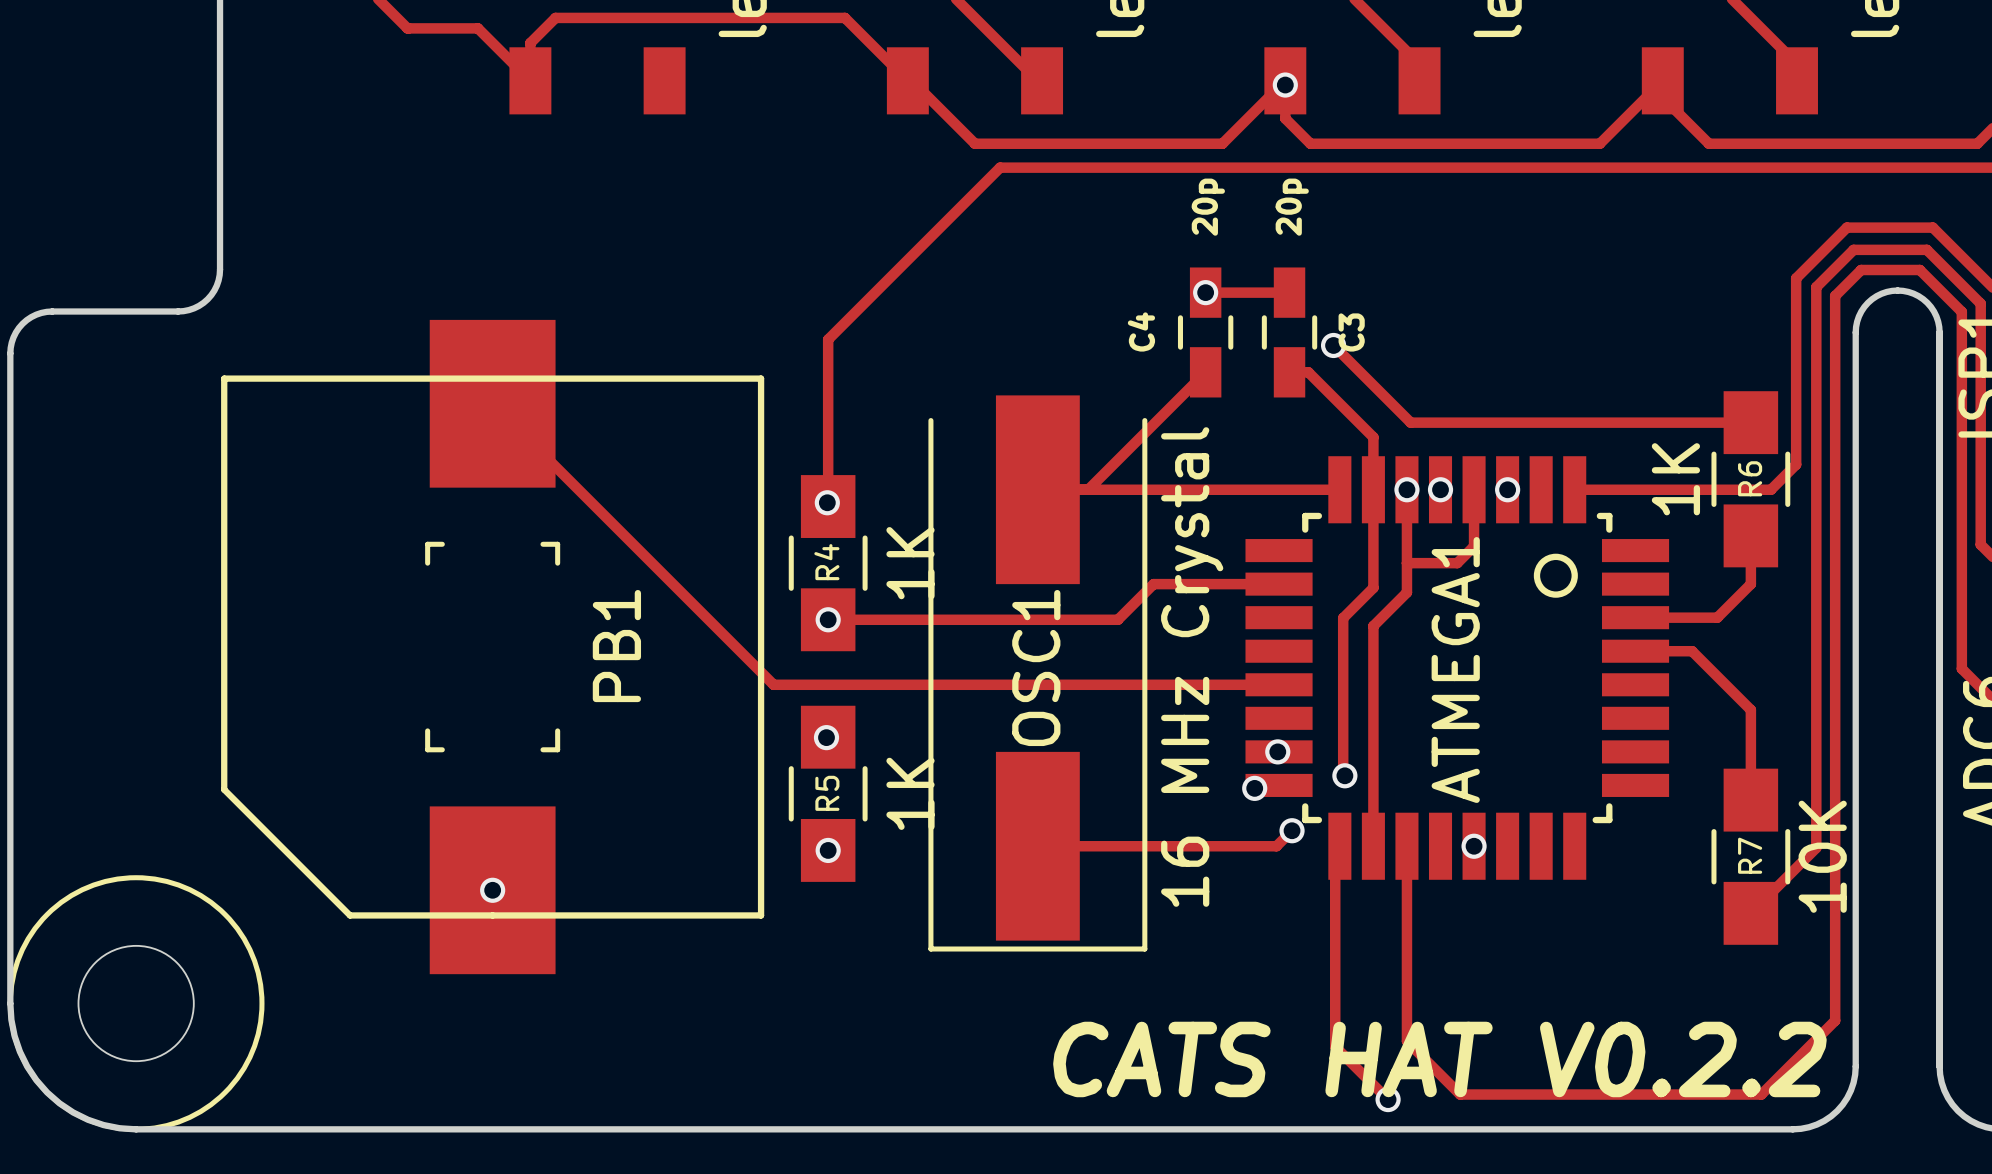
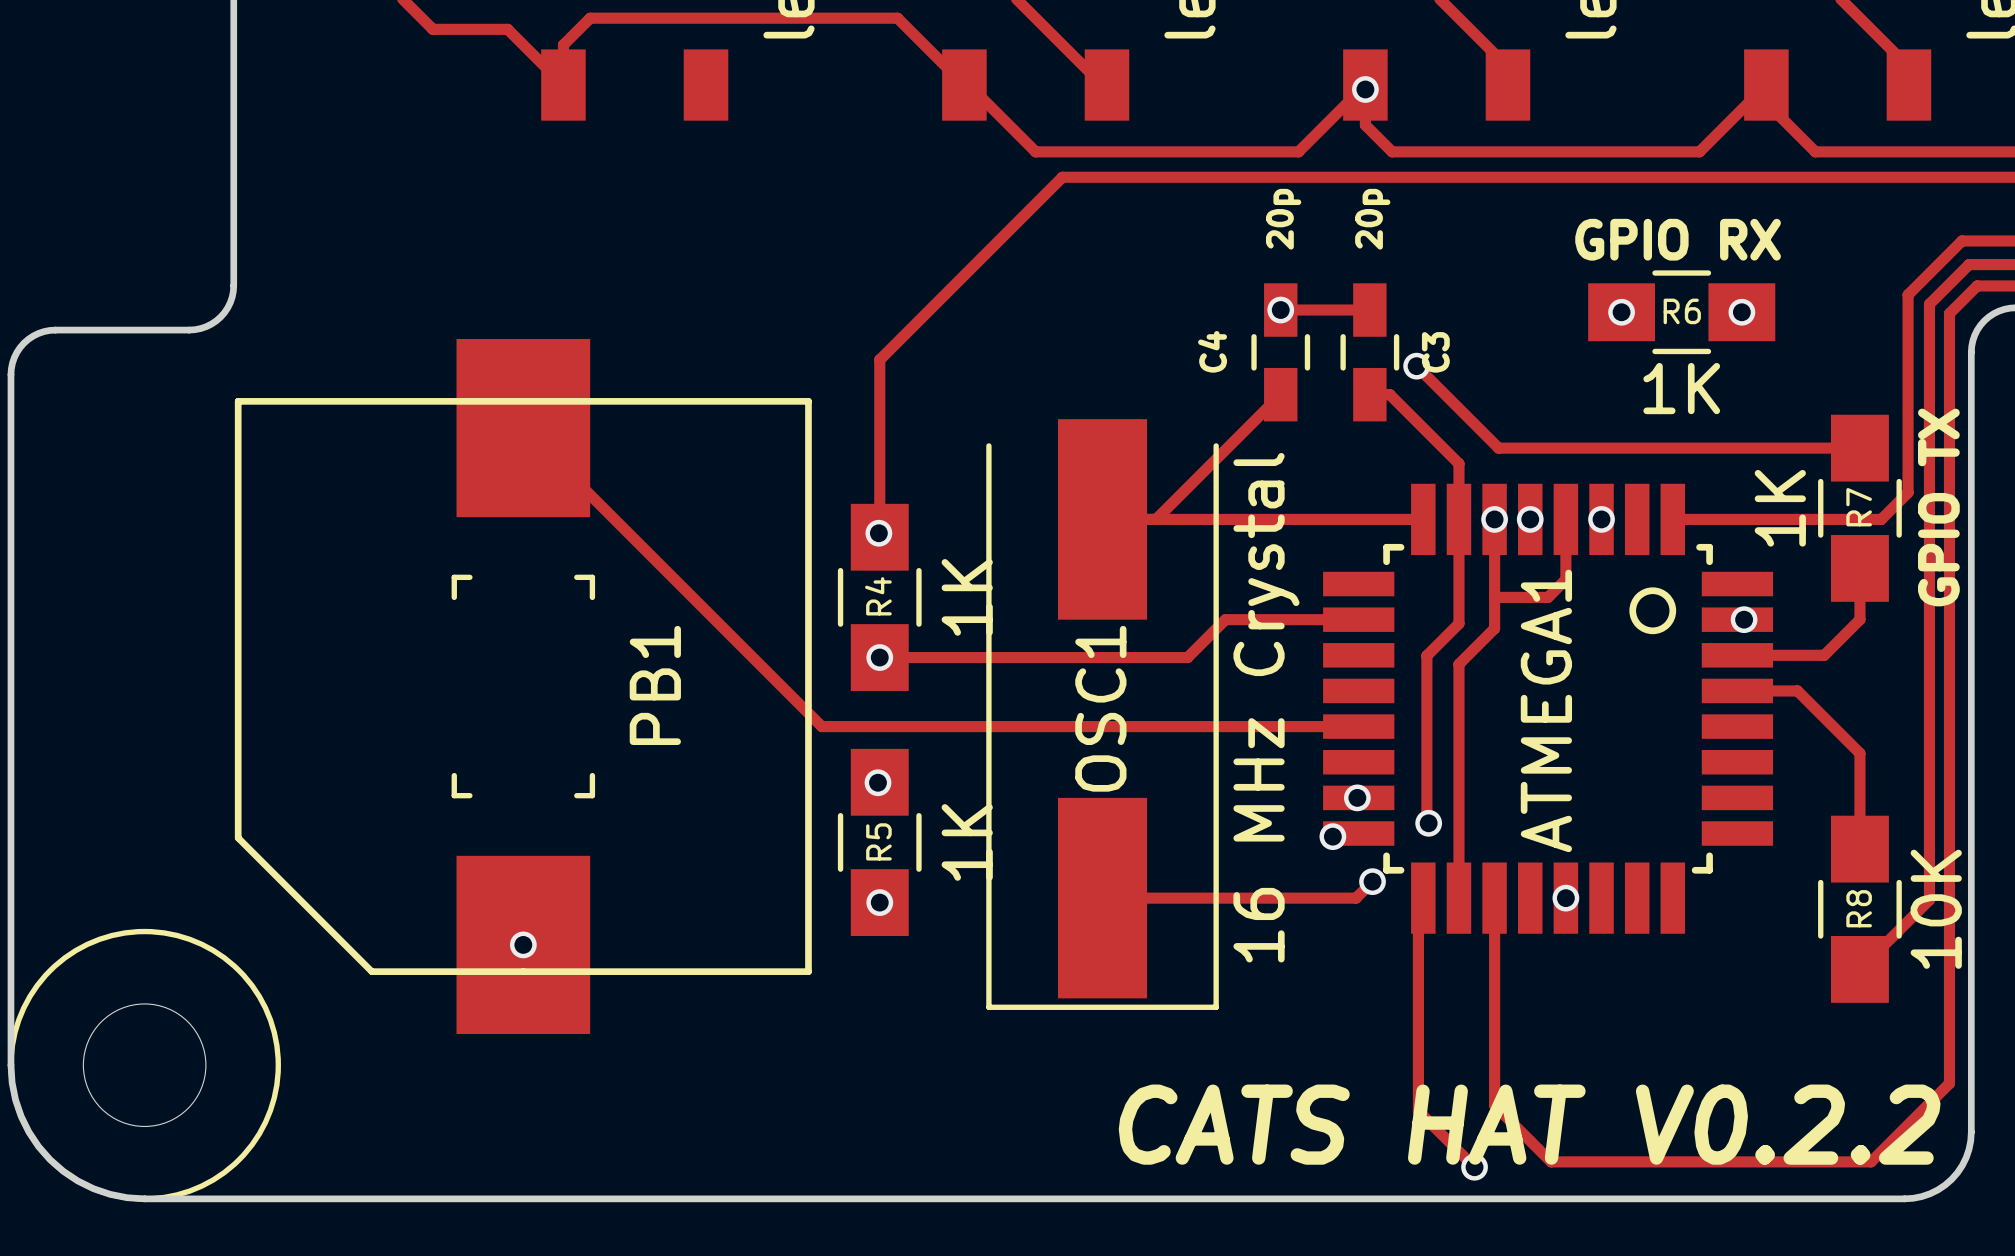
text: none -> GPIO RX (1678, 239)
via: none -> (1621, 312)
R6: none -> 1K (1681, 312)
via: none -> (1741, 312)
R6 name: R6 (1750, 478) -> R7 (1859, 507)
text: none -> GPIO TX (1938, 507)
via: none -> (1744, 619)
R7 name: R7 (1750, 855) -> R8 (1859, 908)

